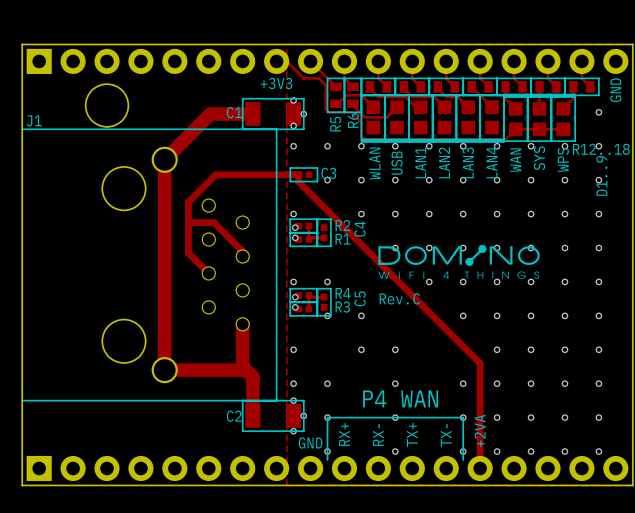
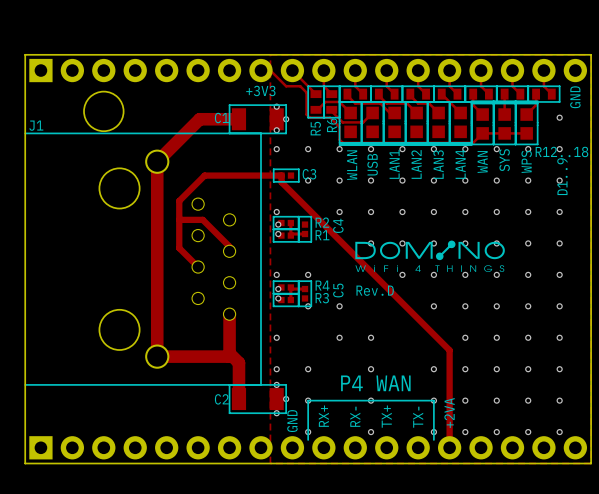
text: C (416, 298) -> D (390, 290)
text rotation: 0° (310, 443) -> 90° counterclockwise (292, 421)

